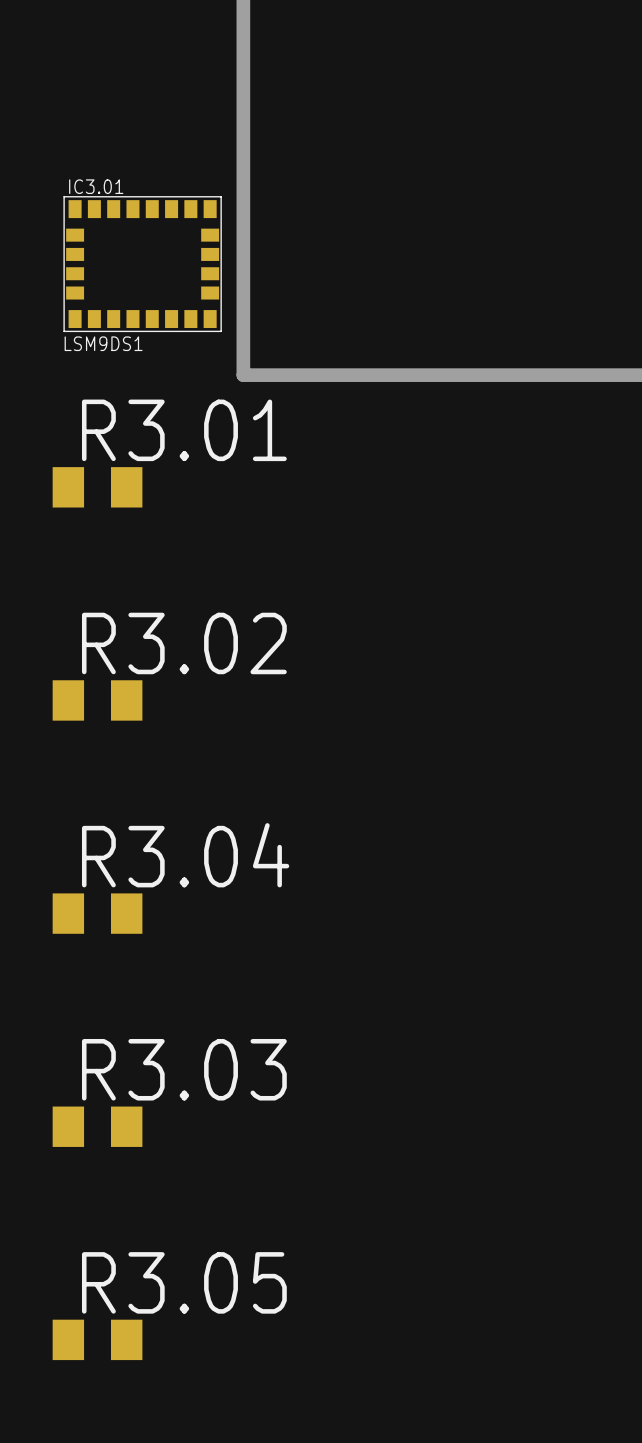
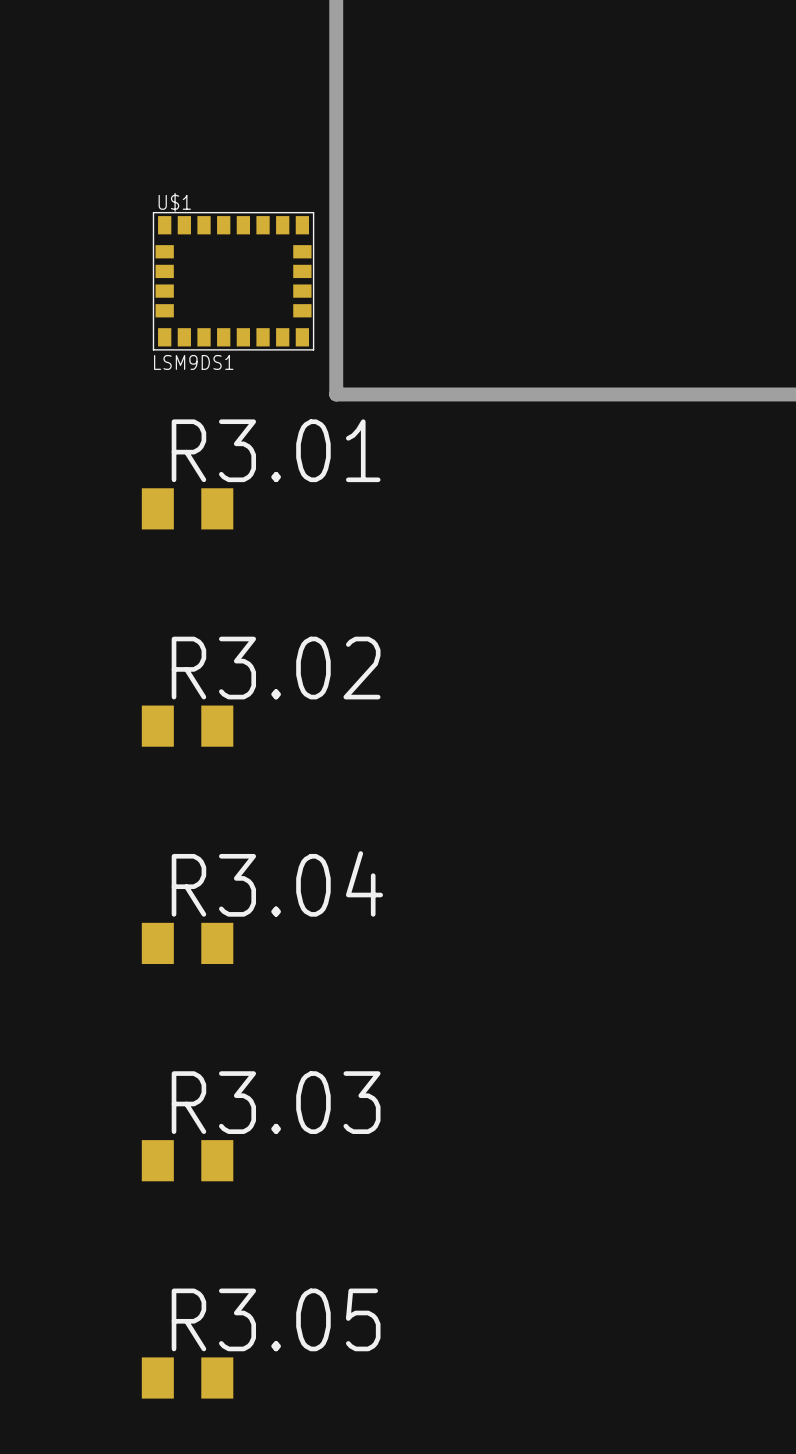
IC3.01 name: IC3.01 (96, 186) -> U$1 (174, 202)

